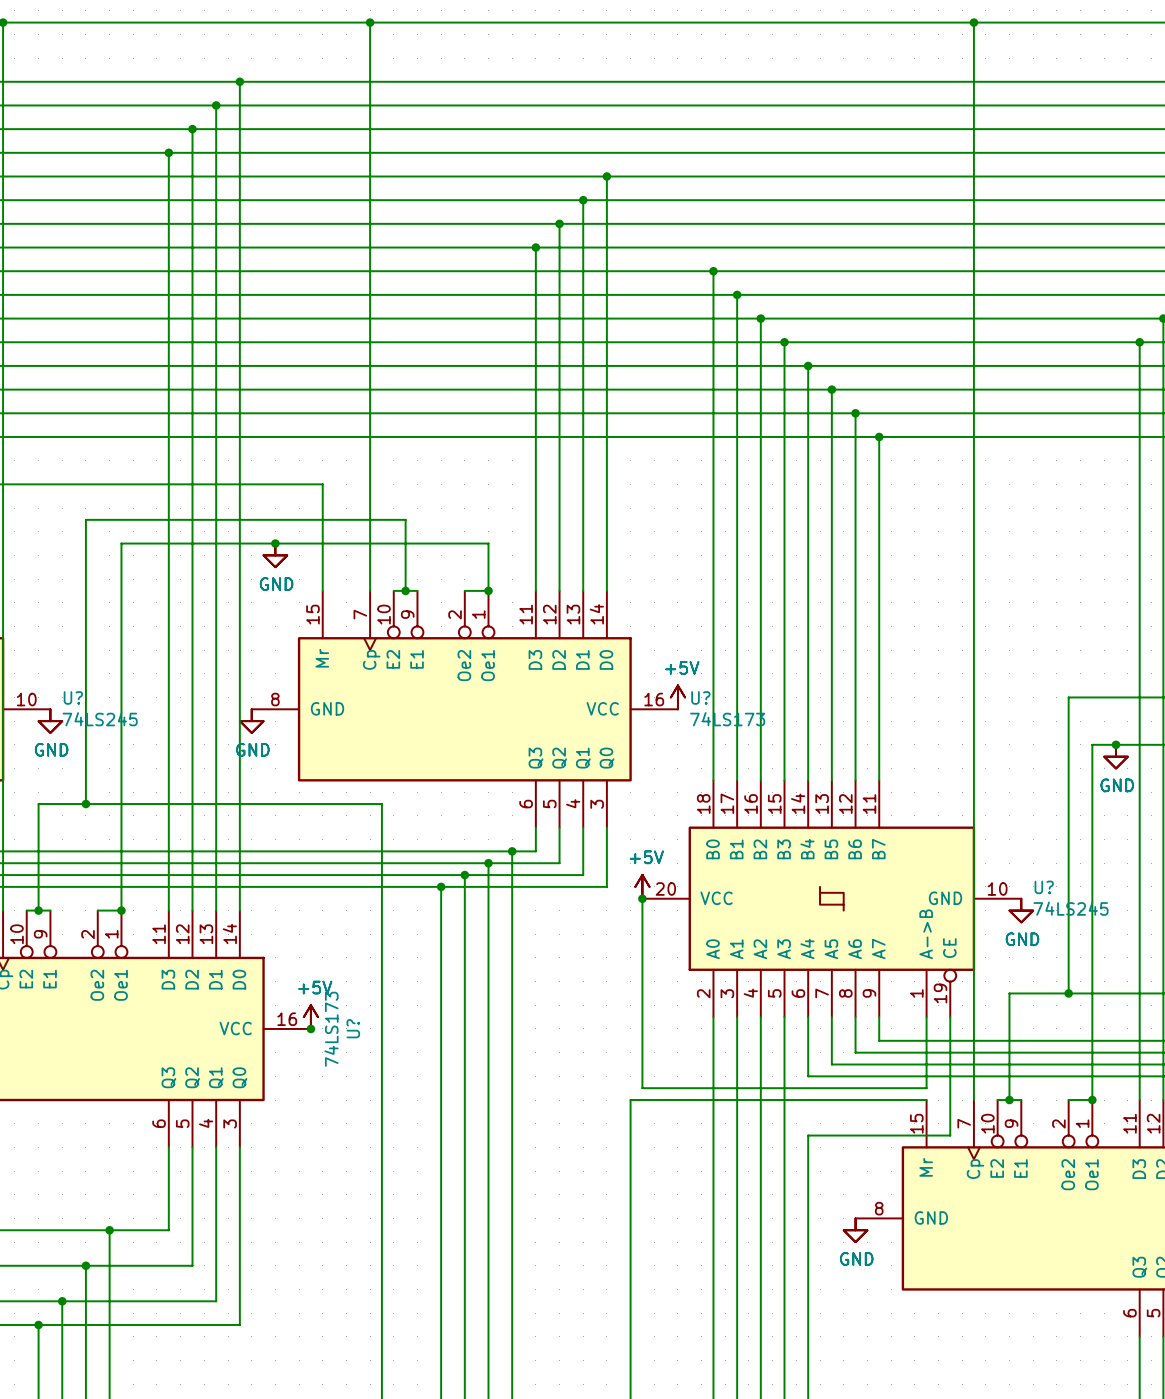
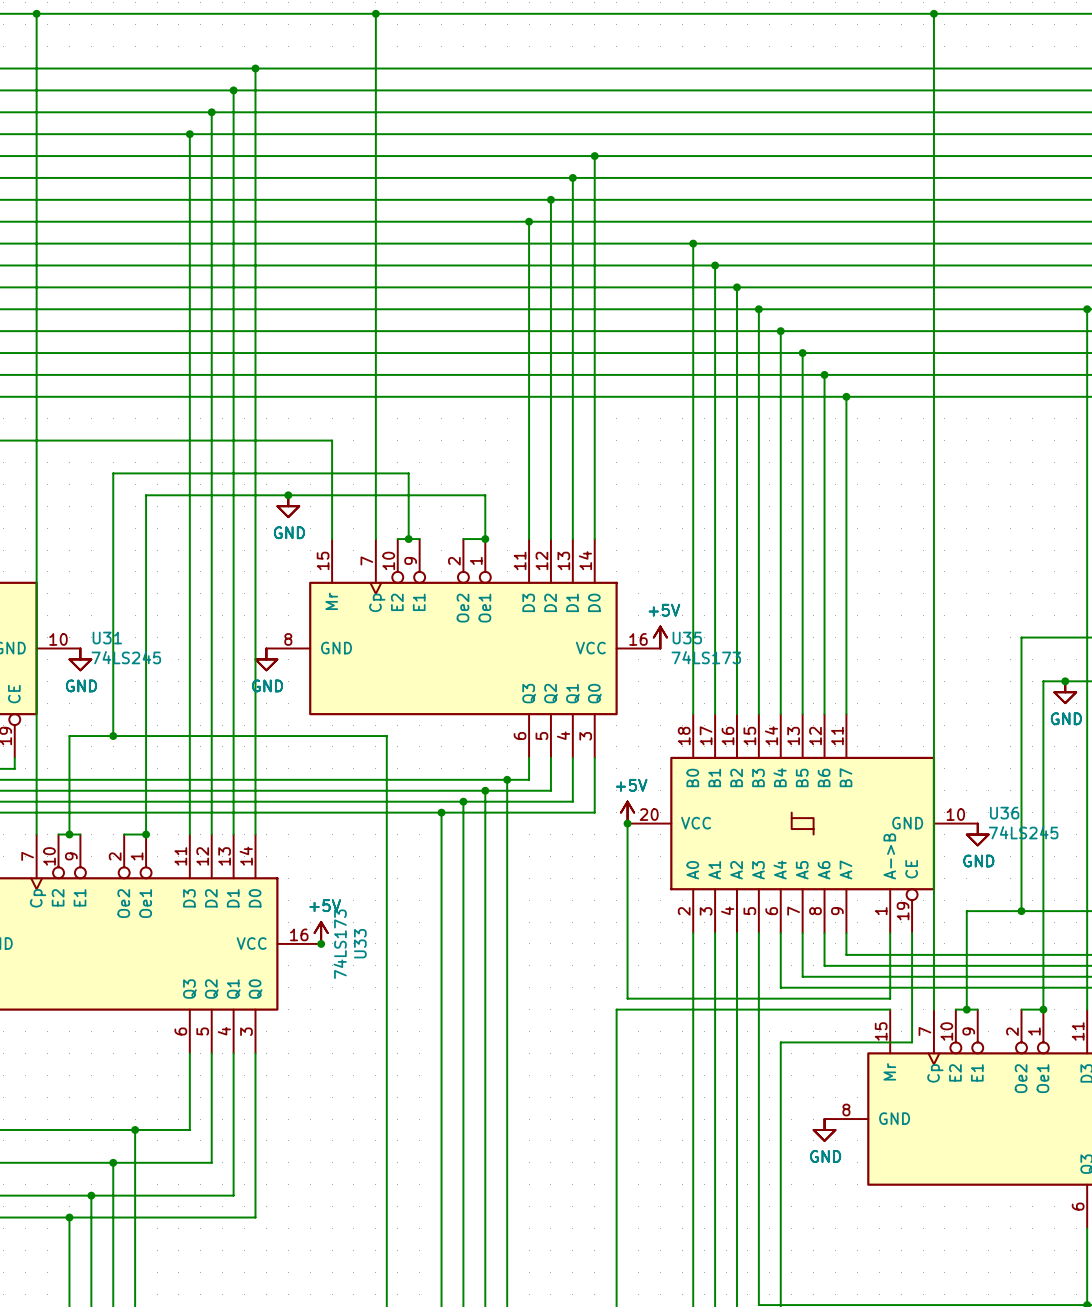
U? name: U? (73, 697) -> U31 (107, 638)
U? name: U? (700, 697) -> U35 (687, 638)
U? name: U? (1044, 887) -> U36 (1004, 813)
U? name: U? (353, 1028) -> U33 (360, 943)

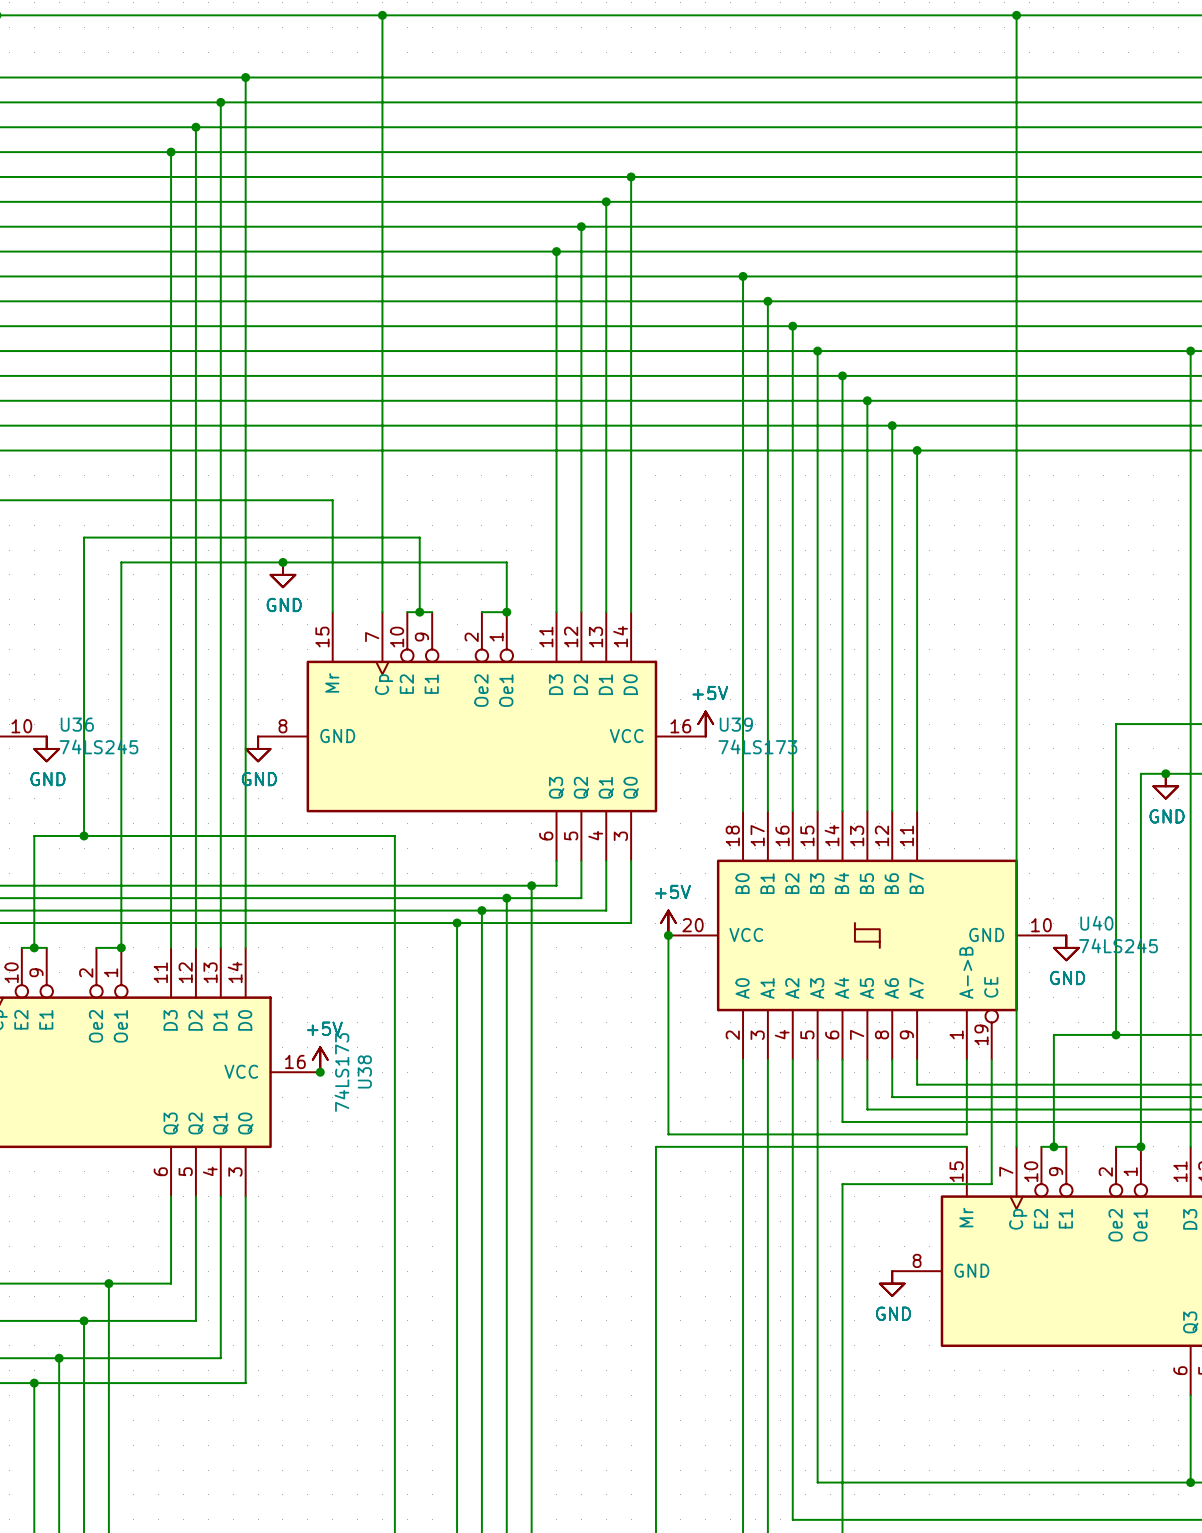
U31 name: U31 (107, 638) -> U36 (77, 724)
U35 name: U35 (687, 638) -> U39 (736, 724)
U36 name: U36 (1004, 813) -> U40 (1096, 923)
U33 name: U33 (360, 943) -> U38 (364, 1071)

